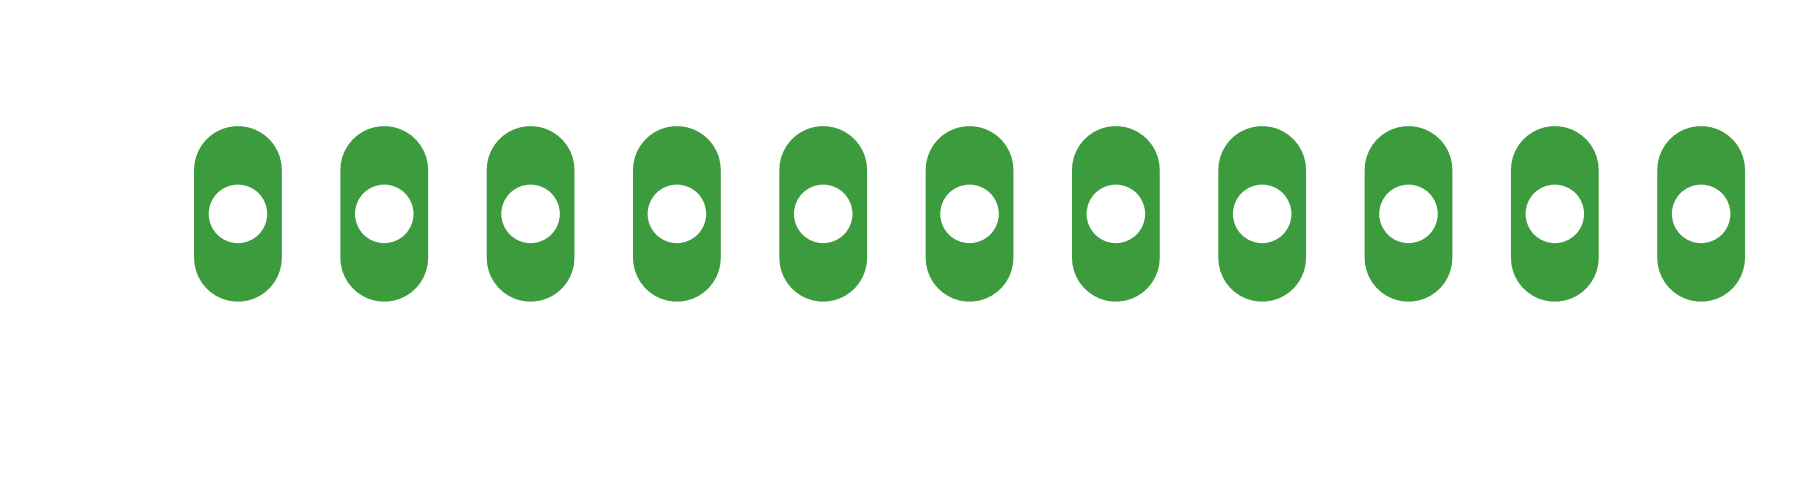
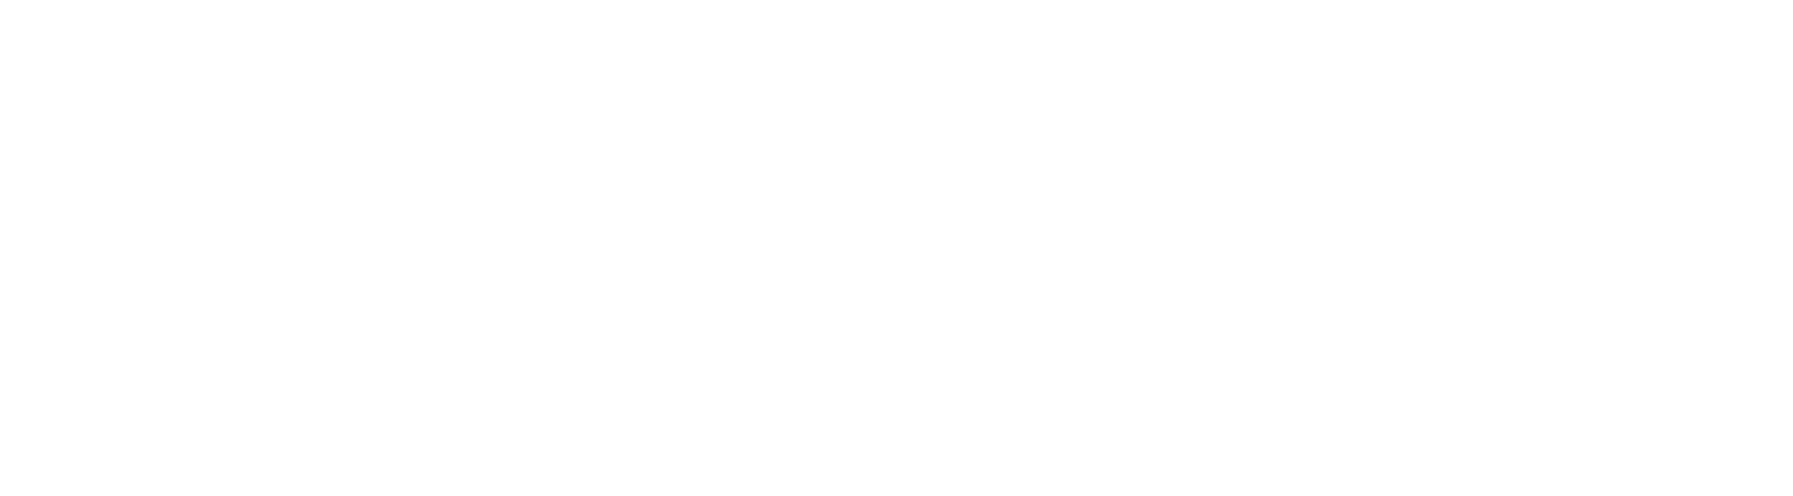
part: (969, 213) -> none

